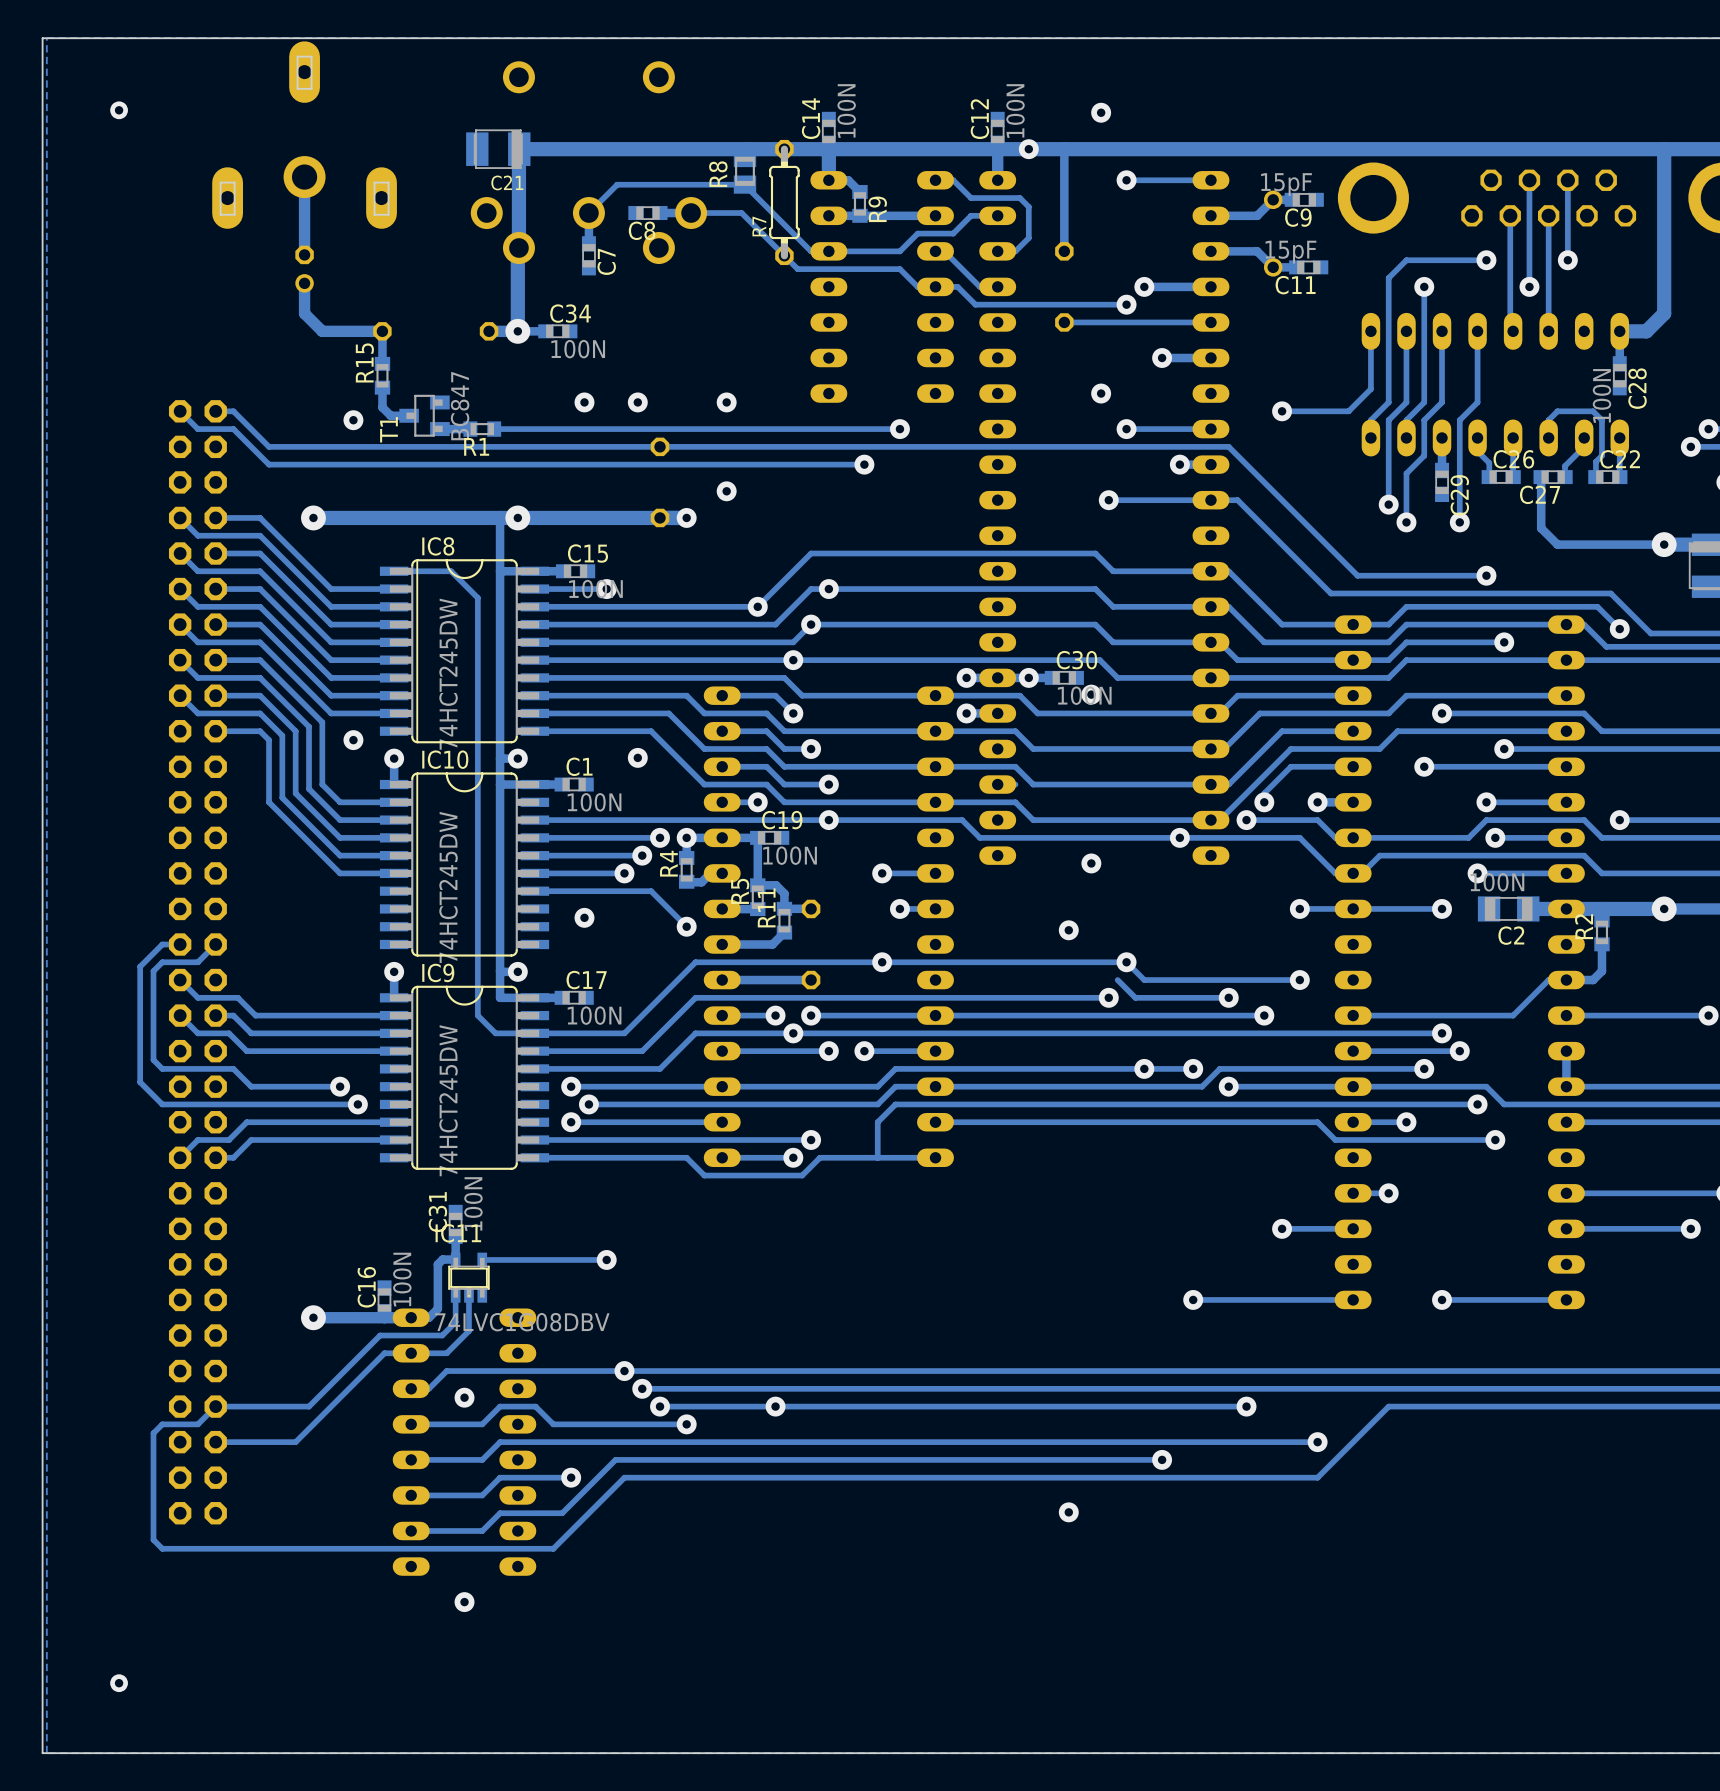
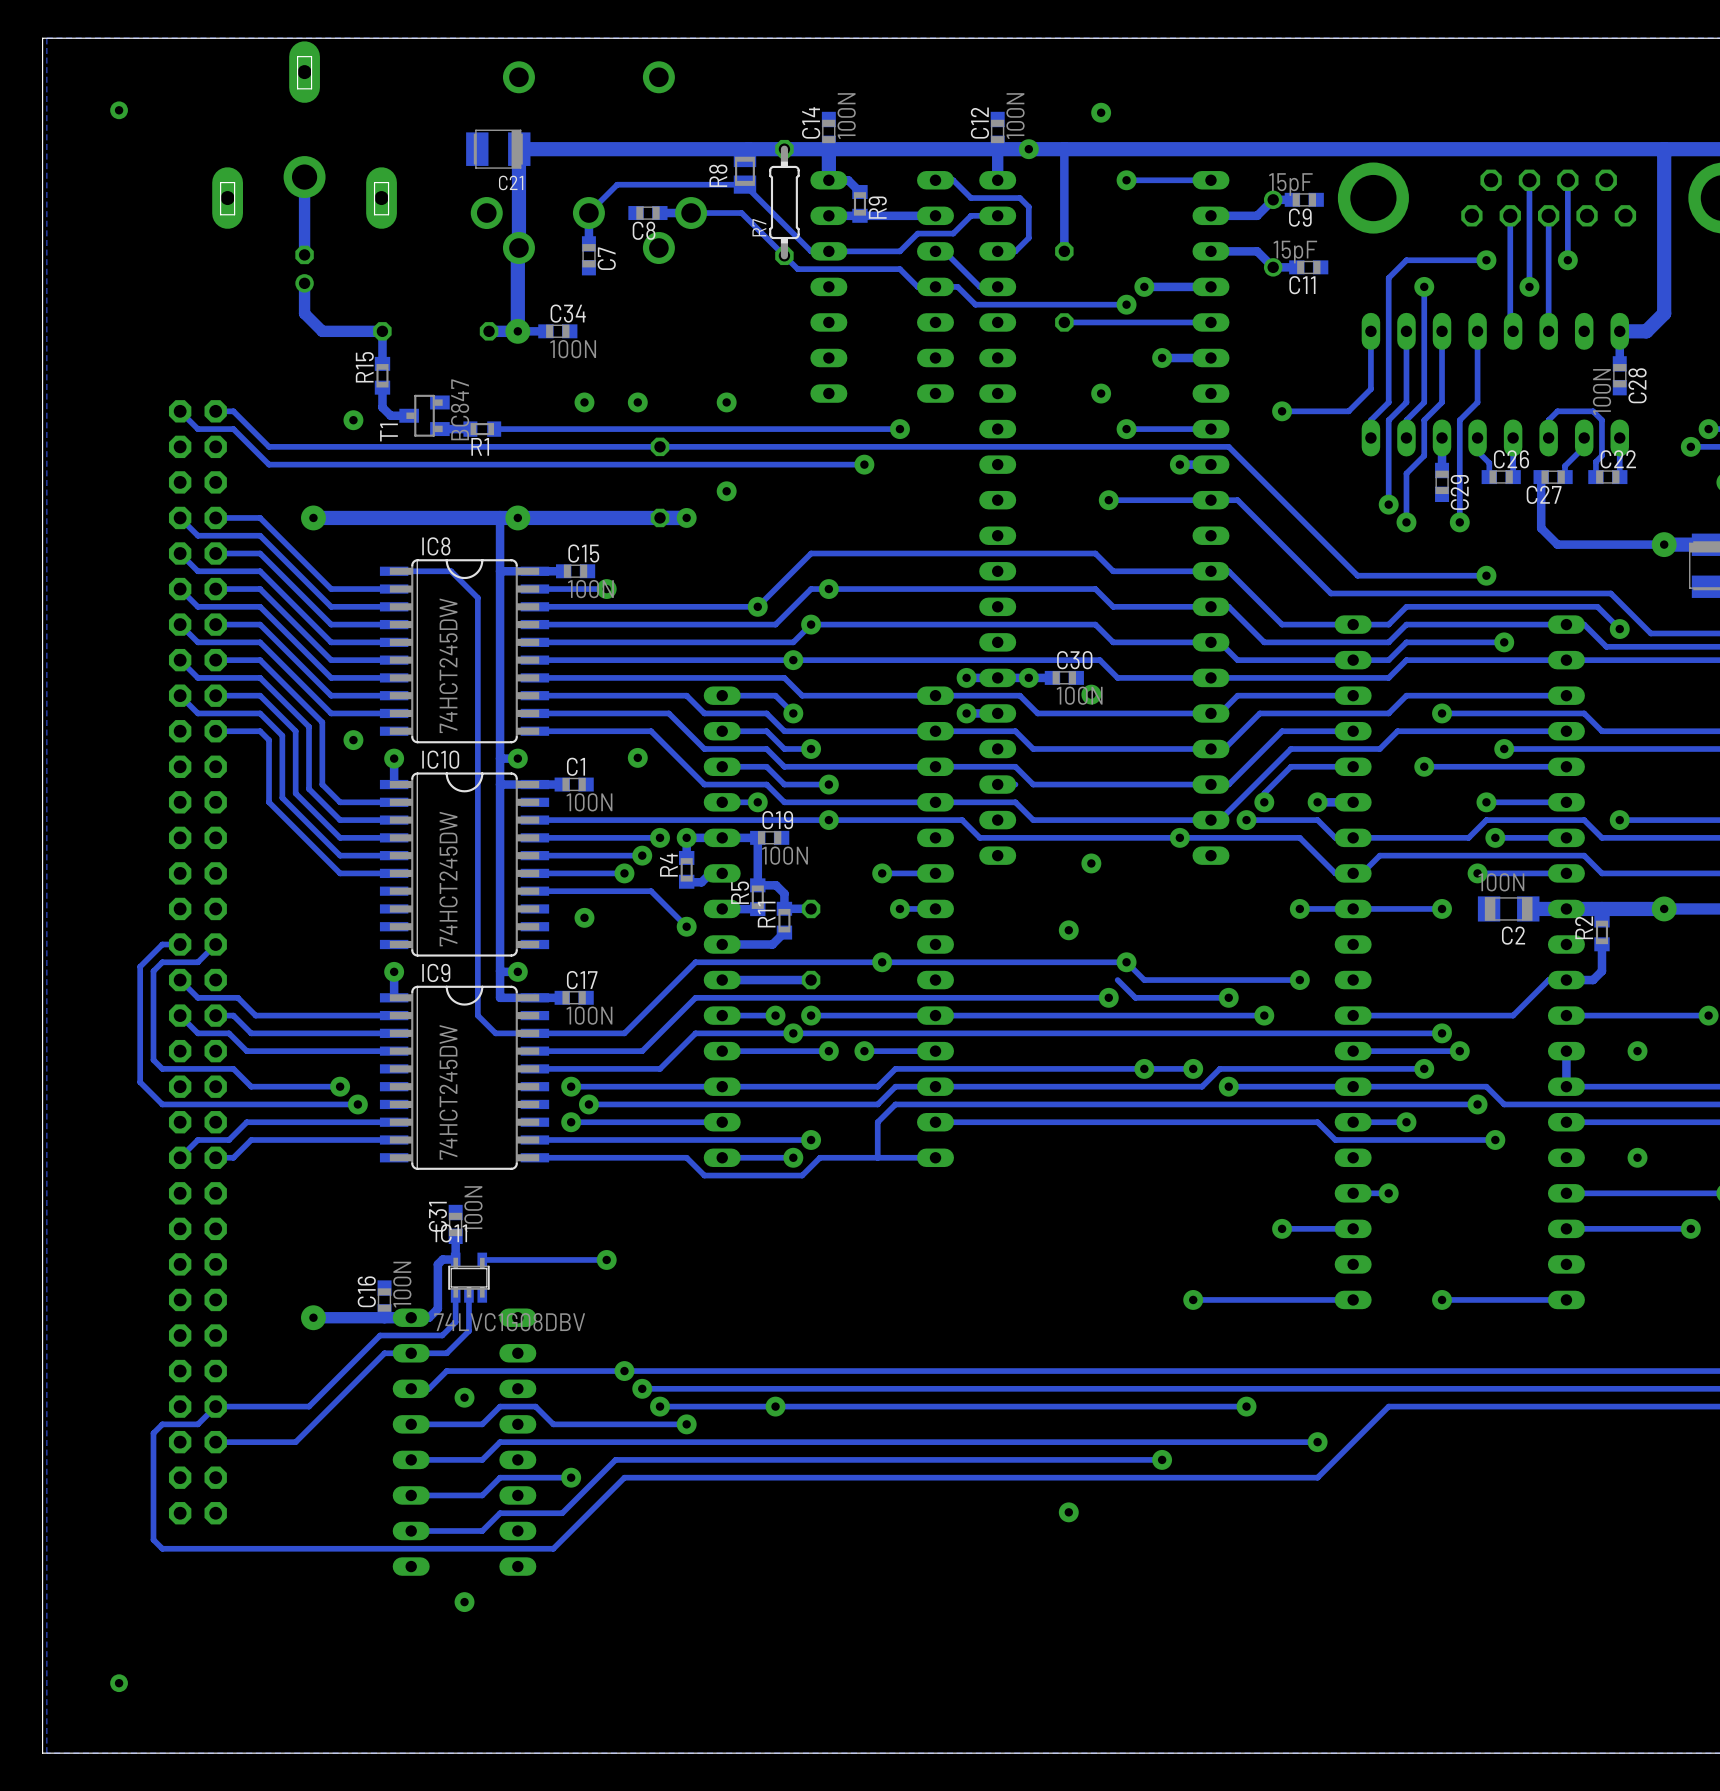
via: none -> (1637, 1051)
via: none -> (1637, 1157)

